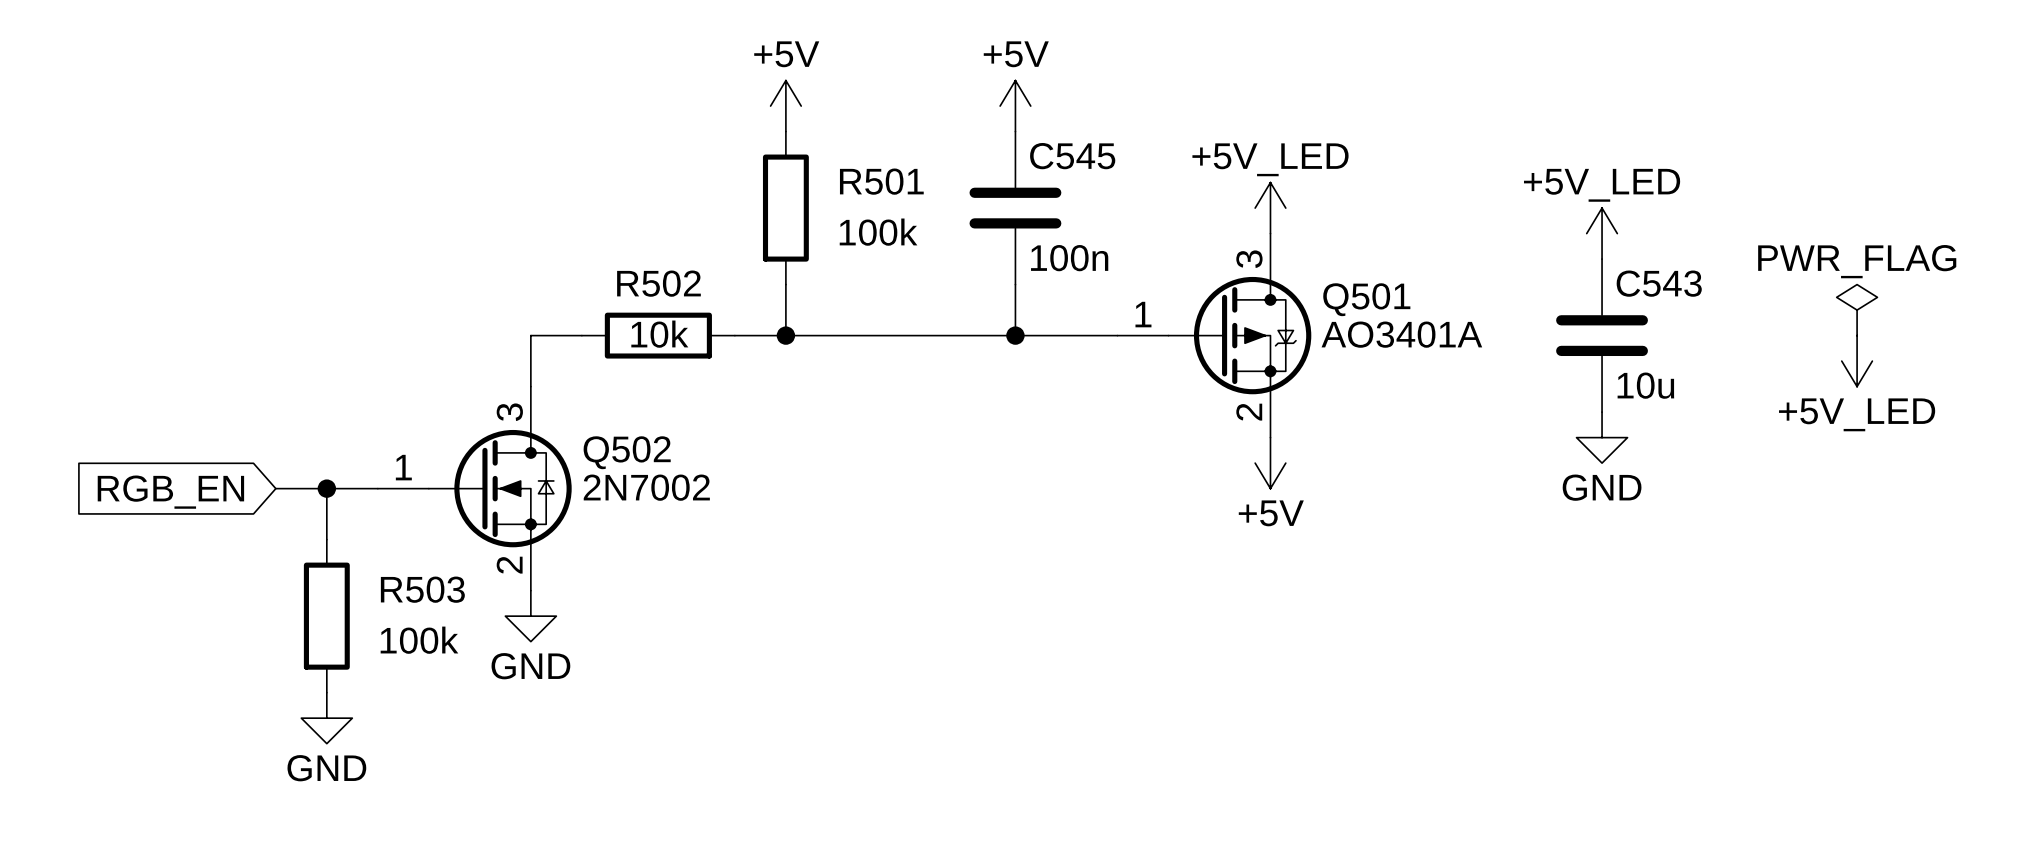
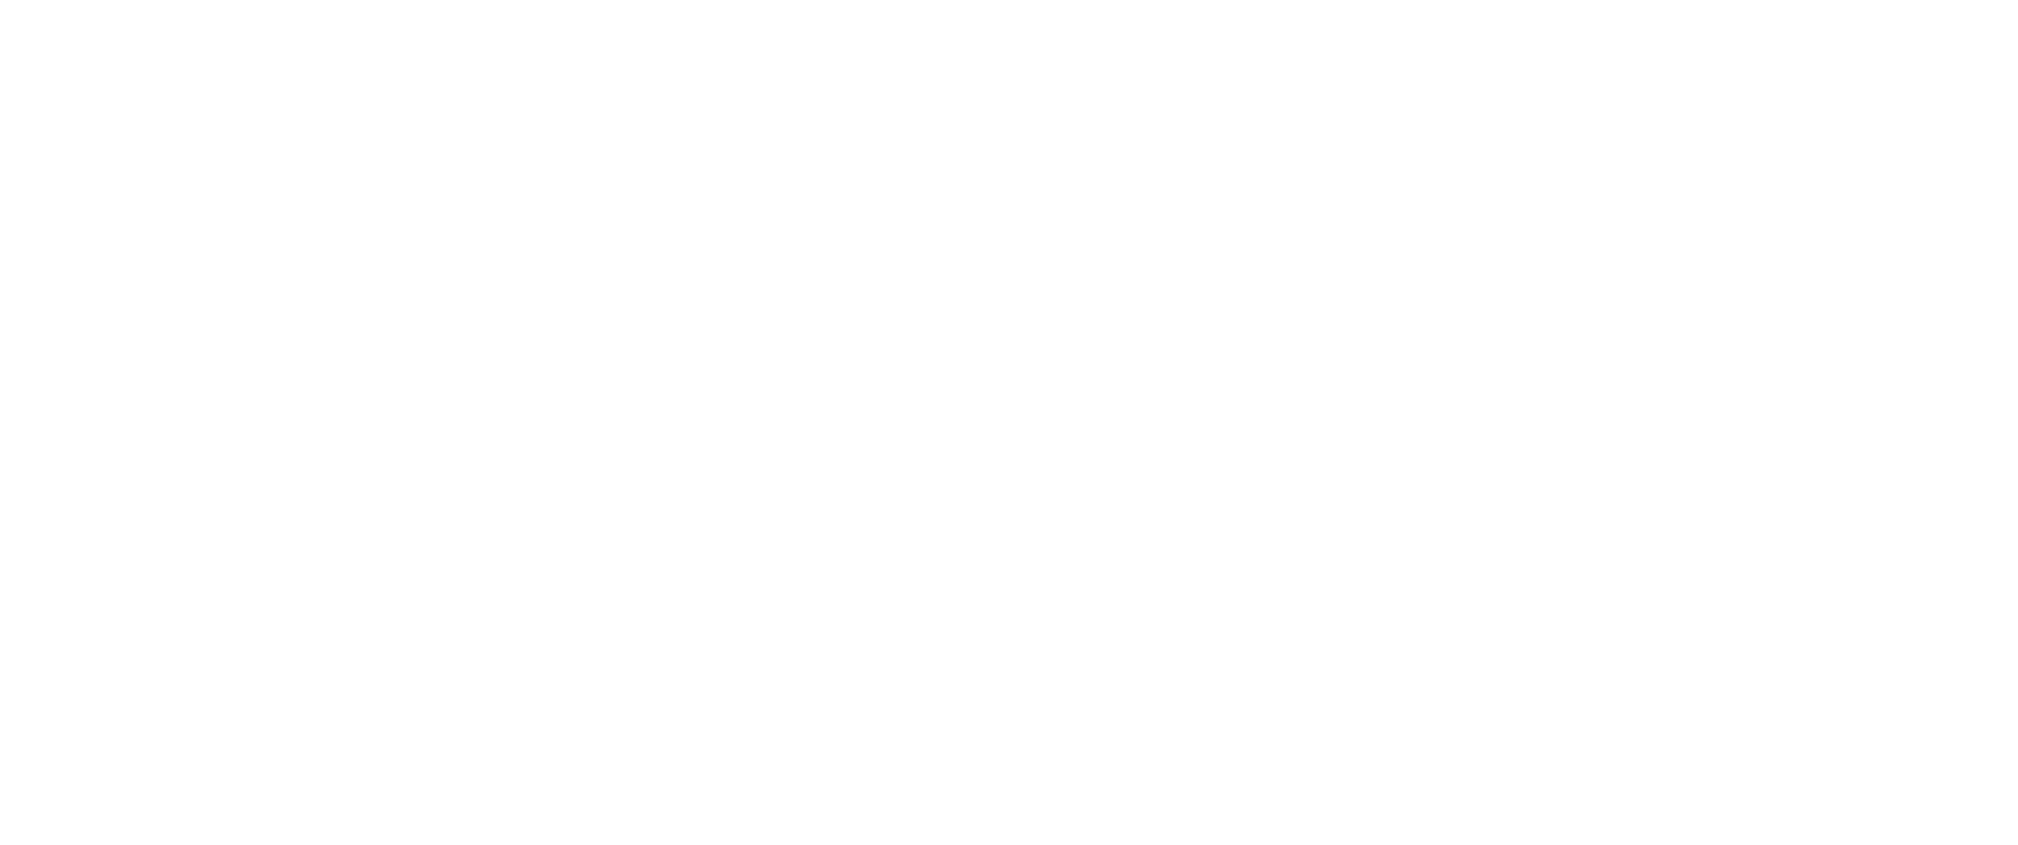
power symbol: +5V (785, 106) -> none
power symbol: +5V (1015, 106) -> none
R501: 100k (785, 208) -> none
C545: 100n (1015, 208) -> none
power symbol: +5V_LED (1270, 208) -> none
power symbol: +5V_LED (1602, 233) -> none
wire: (785, 284) (785, 335) -> none
wire: (1015, 284) (1015, 335) -> none
power symbol: PWR_FLAG (1857, 310) -> none
wire: (581, 335) (530, 335) (530, 386) -> none
R502: 10k (658, 335) -> none
wire: (734, 335) (1117, 335) -> none
junction: (785, 335) -> none
junction: (1015, 335) -> none
Q501: AO3401A (1214, 335) -> none
C543: 10u (1602, 335) -> none
power symbol: +5V_LED (1857, 361) -> none
power symbol: GND (1602, 437) -> none
power symbol: +5V (1270, 463) -> none
wire: (275, 488) (377, 488) -> none
wire: (326, 488) (326, 539) -> none
junction: (326, 488) -> none
Q502: 2N7002 (474, 488) -> none
global label: RGB_EN (170, 492) -> none
R503: 100k (326, 616) -> none
power symbol: GND (530, 616) -> none
power symbol: GND (326, 718) -> none

